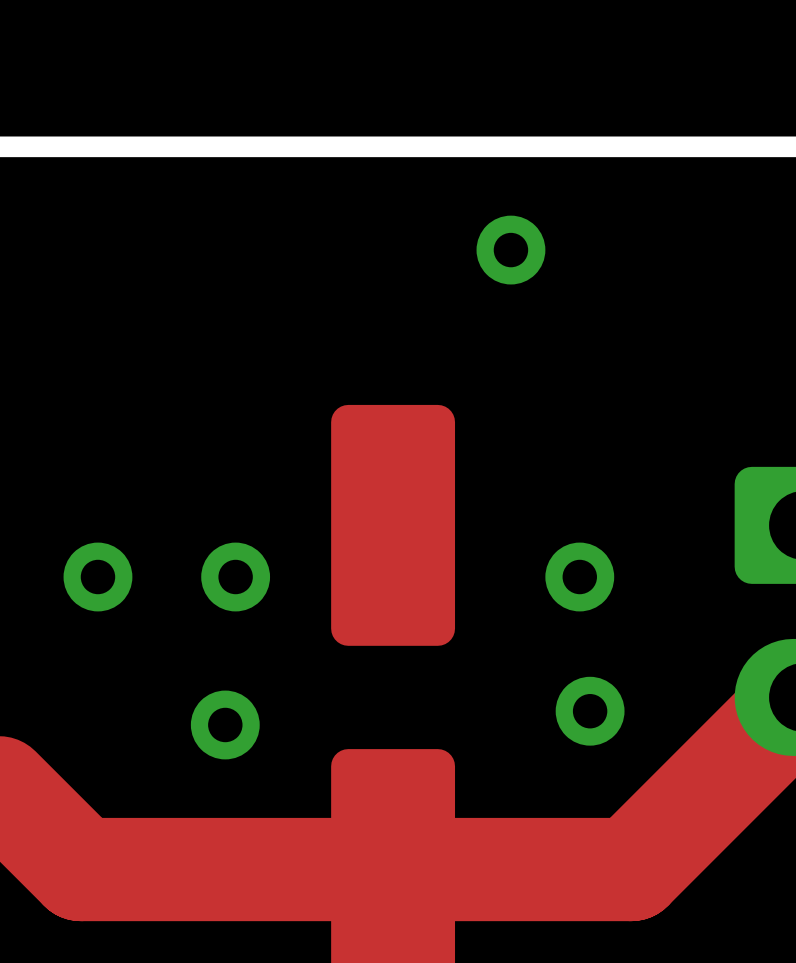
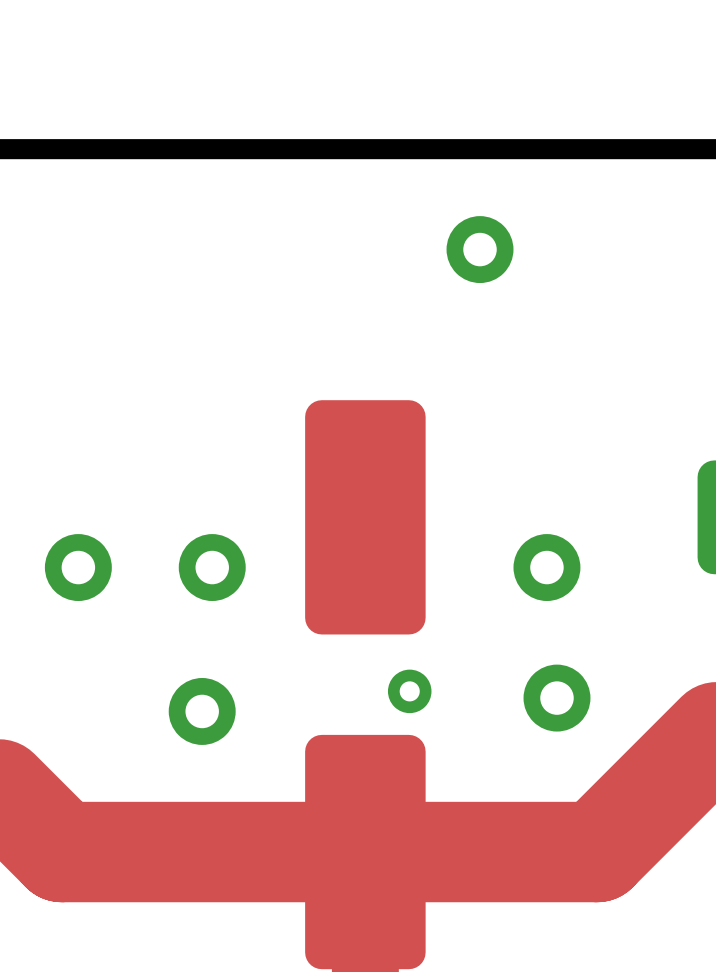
via: none -> (409, 691)

